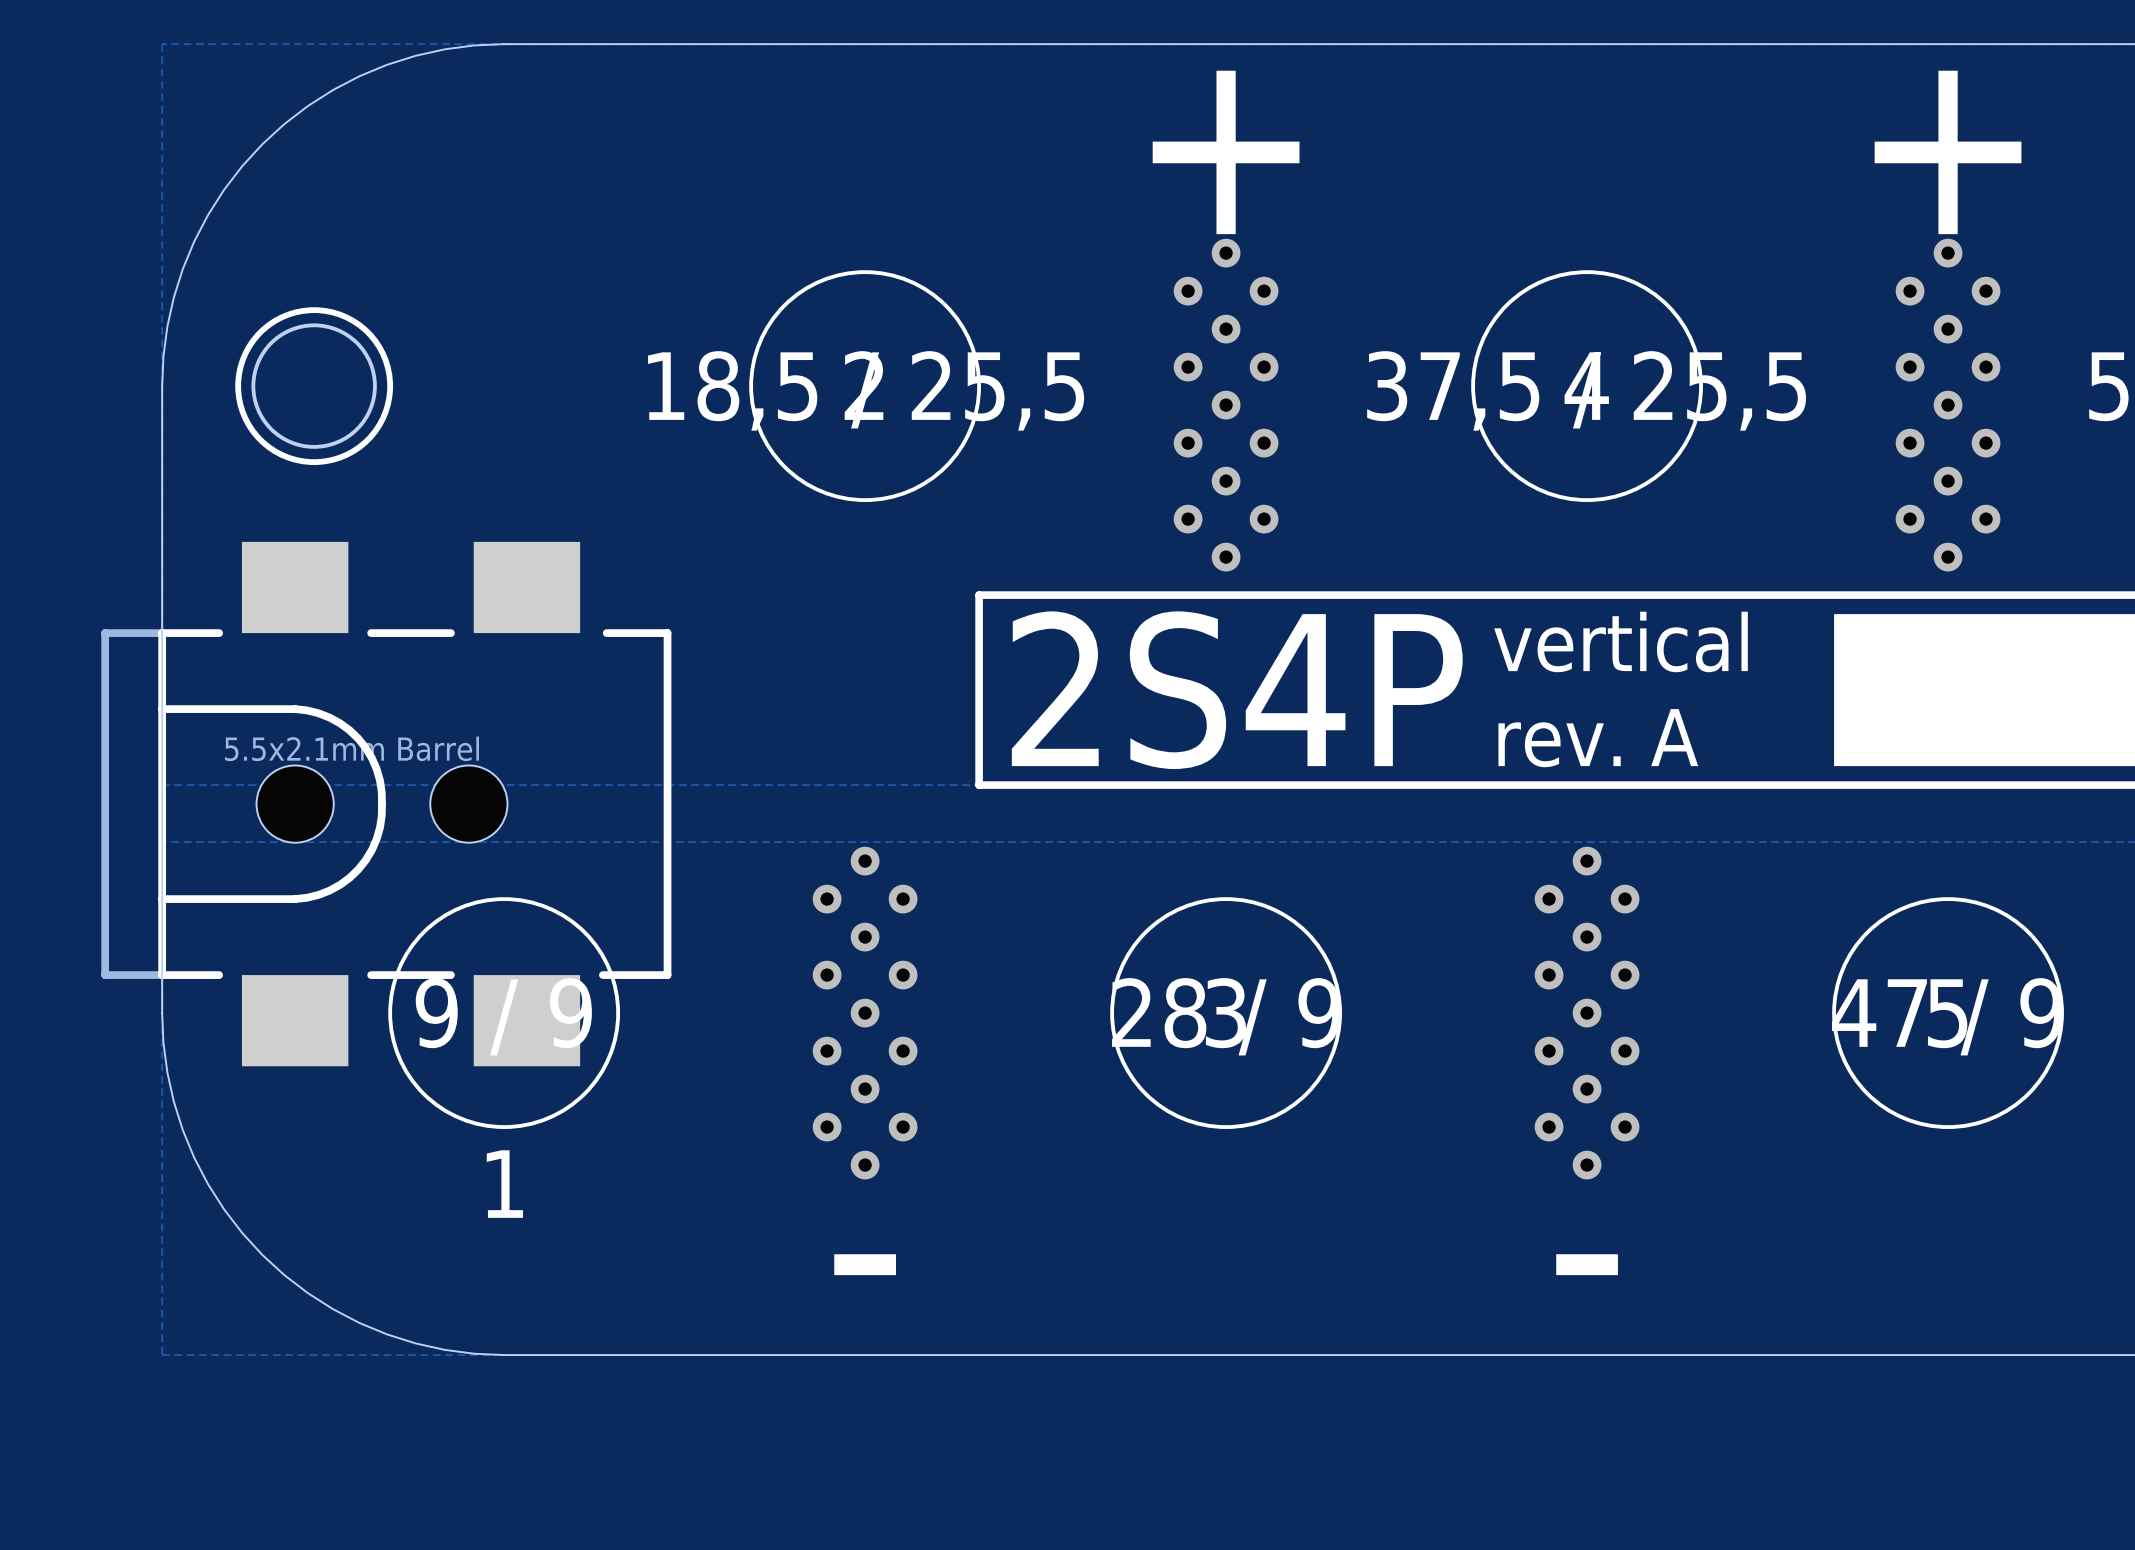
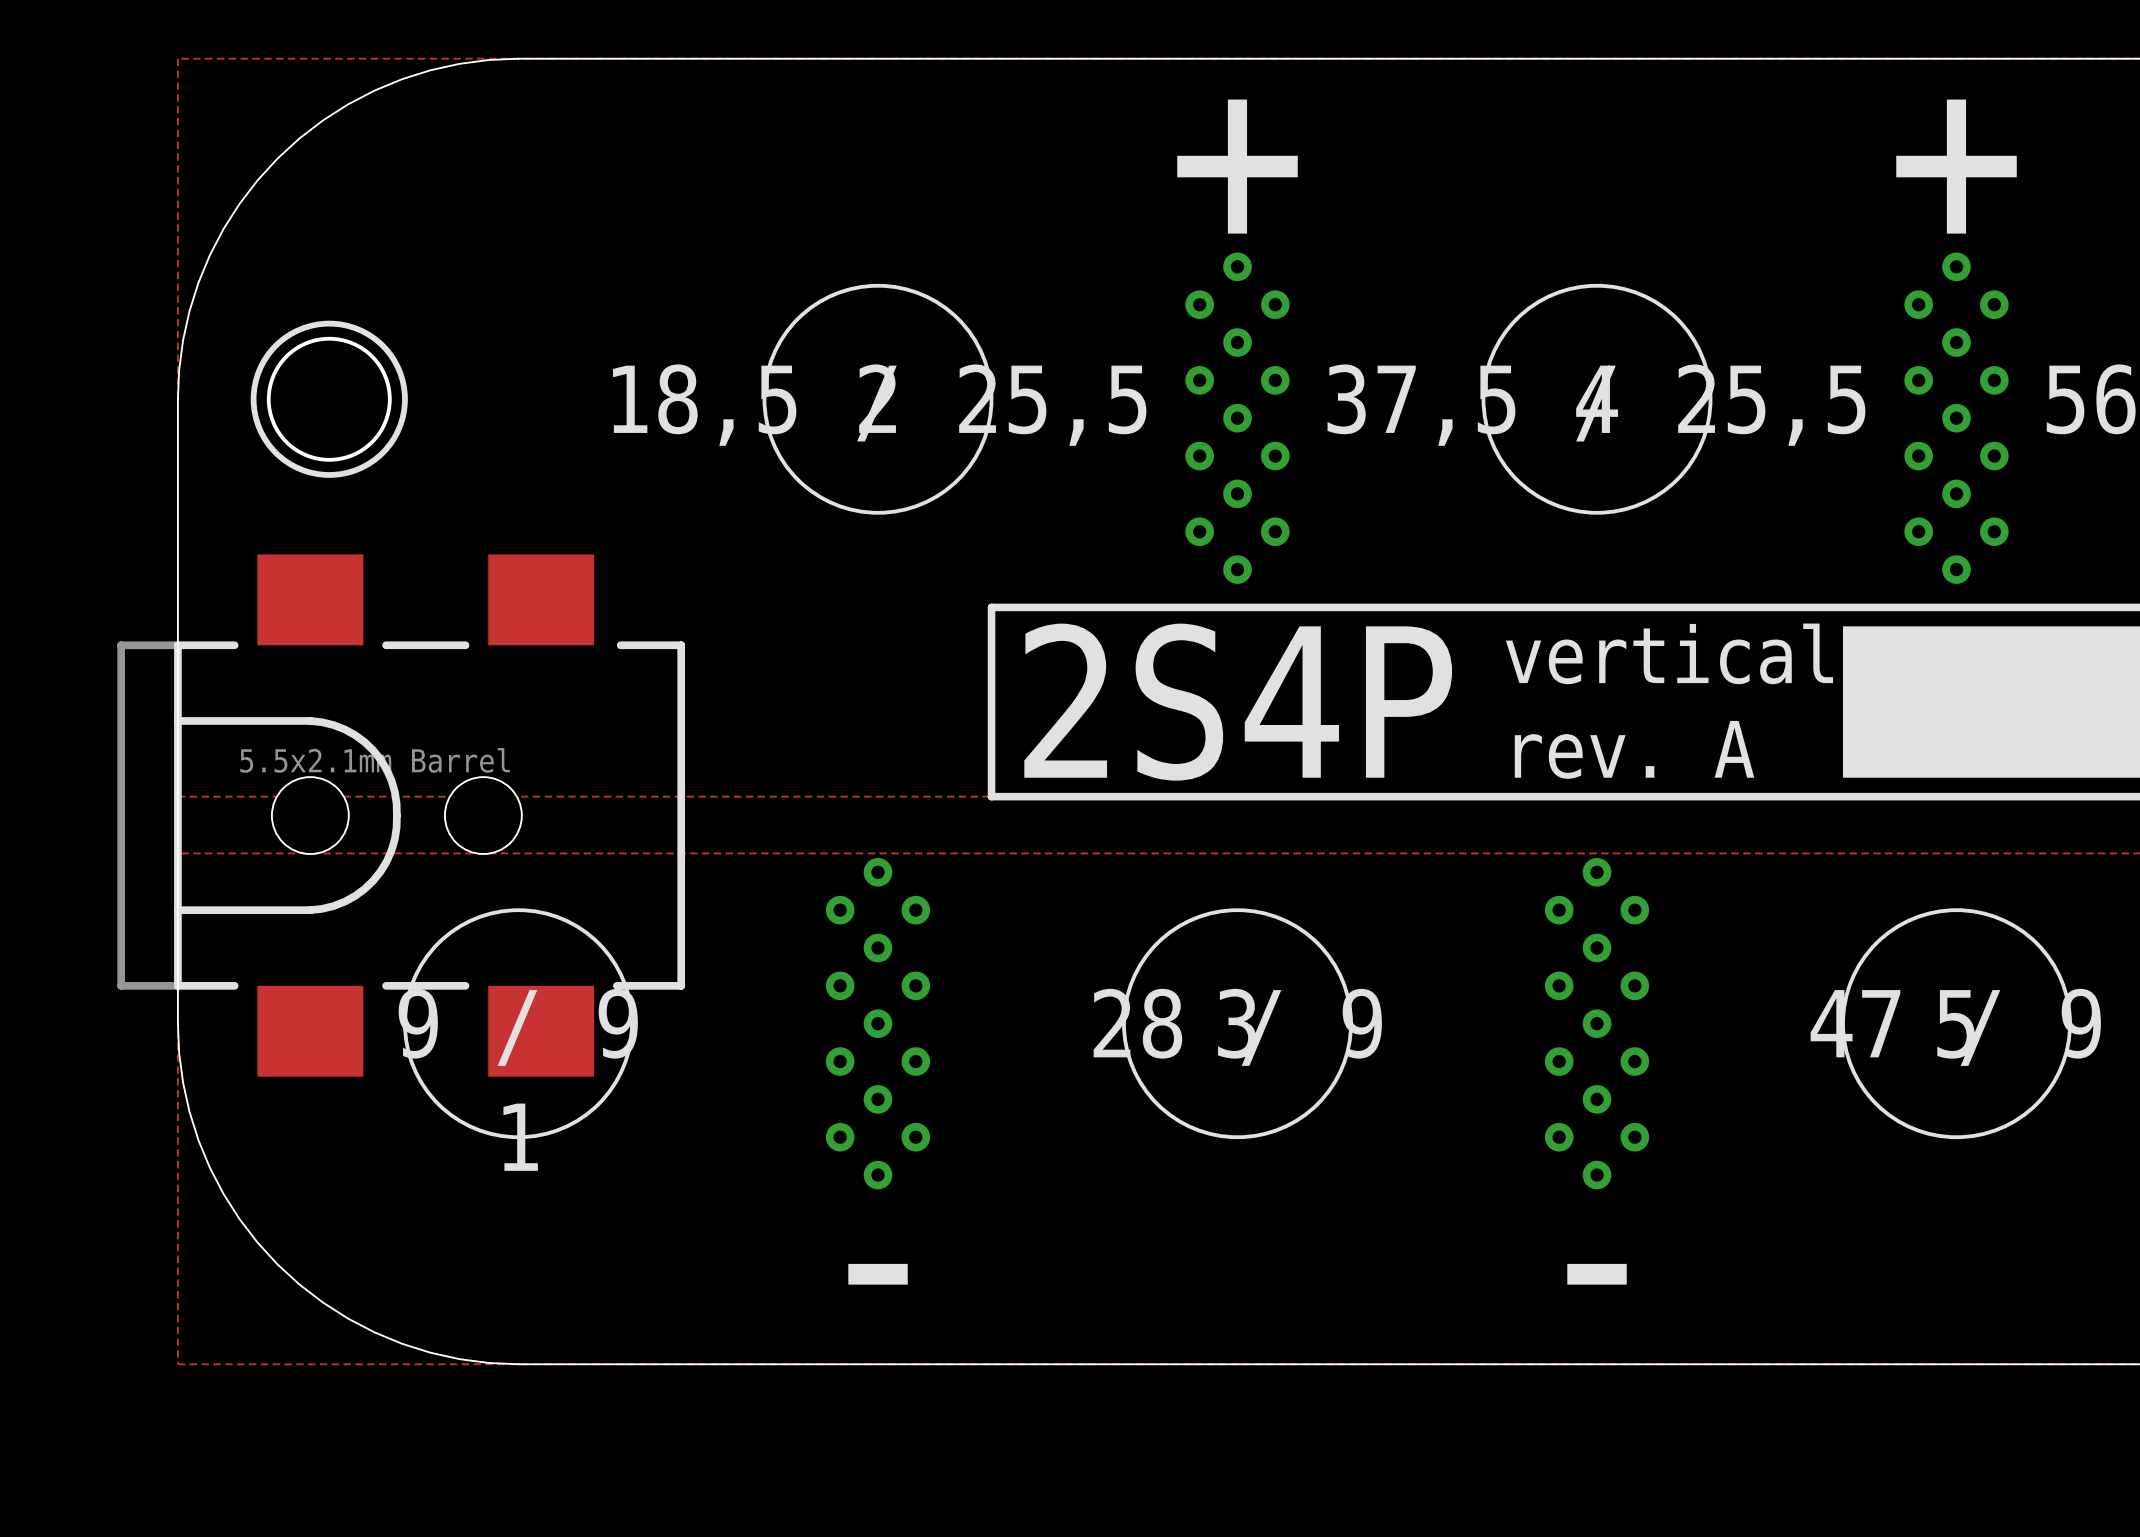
text position: 1 (504, 1184) -> 1 (520, 1137)

